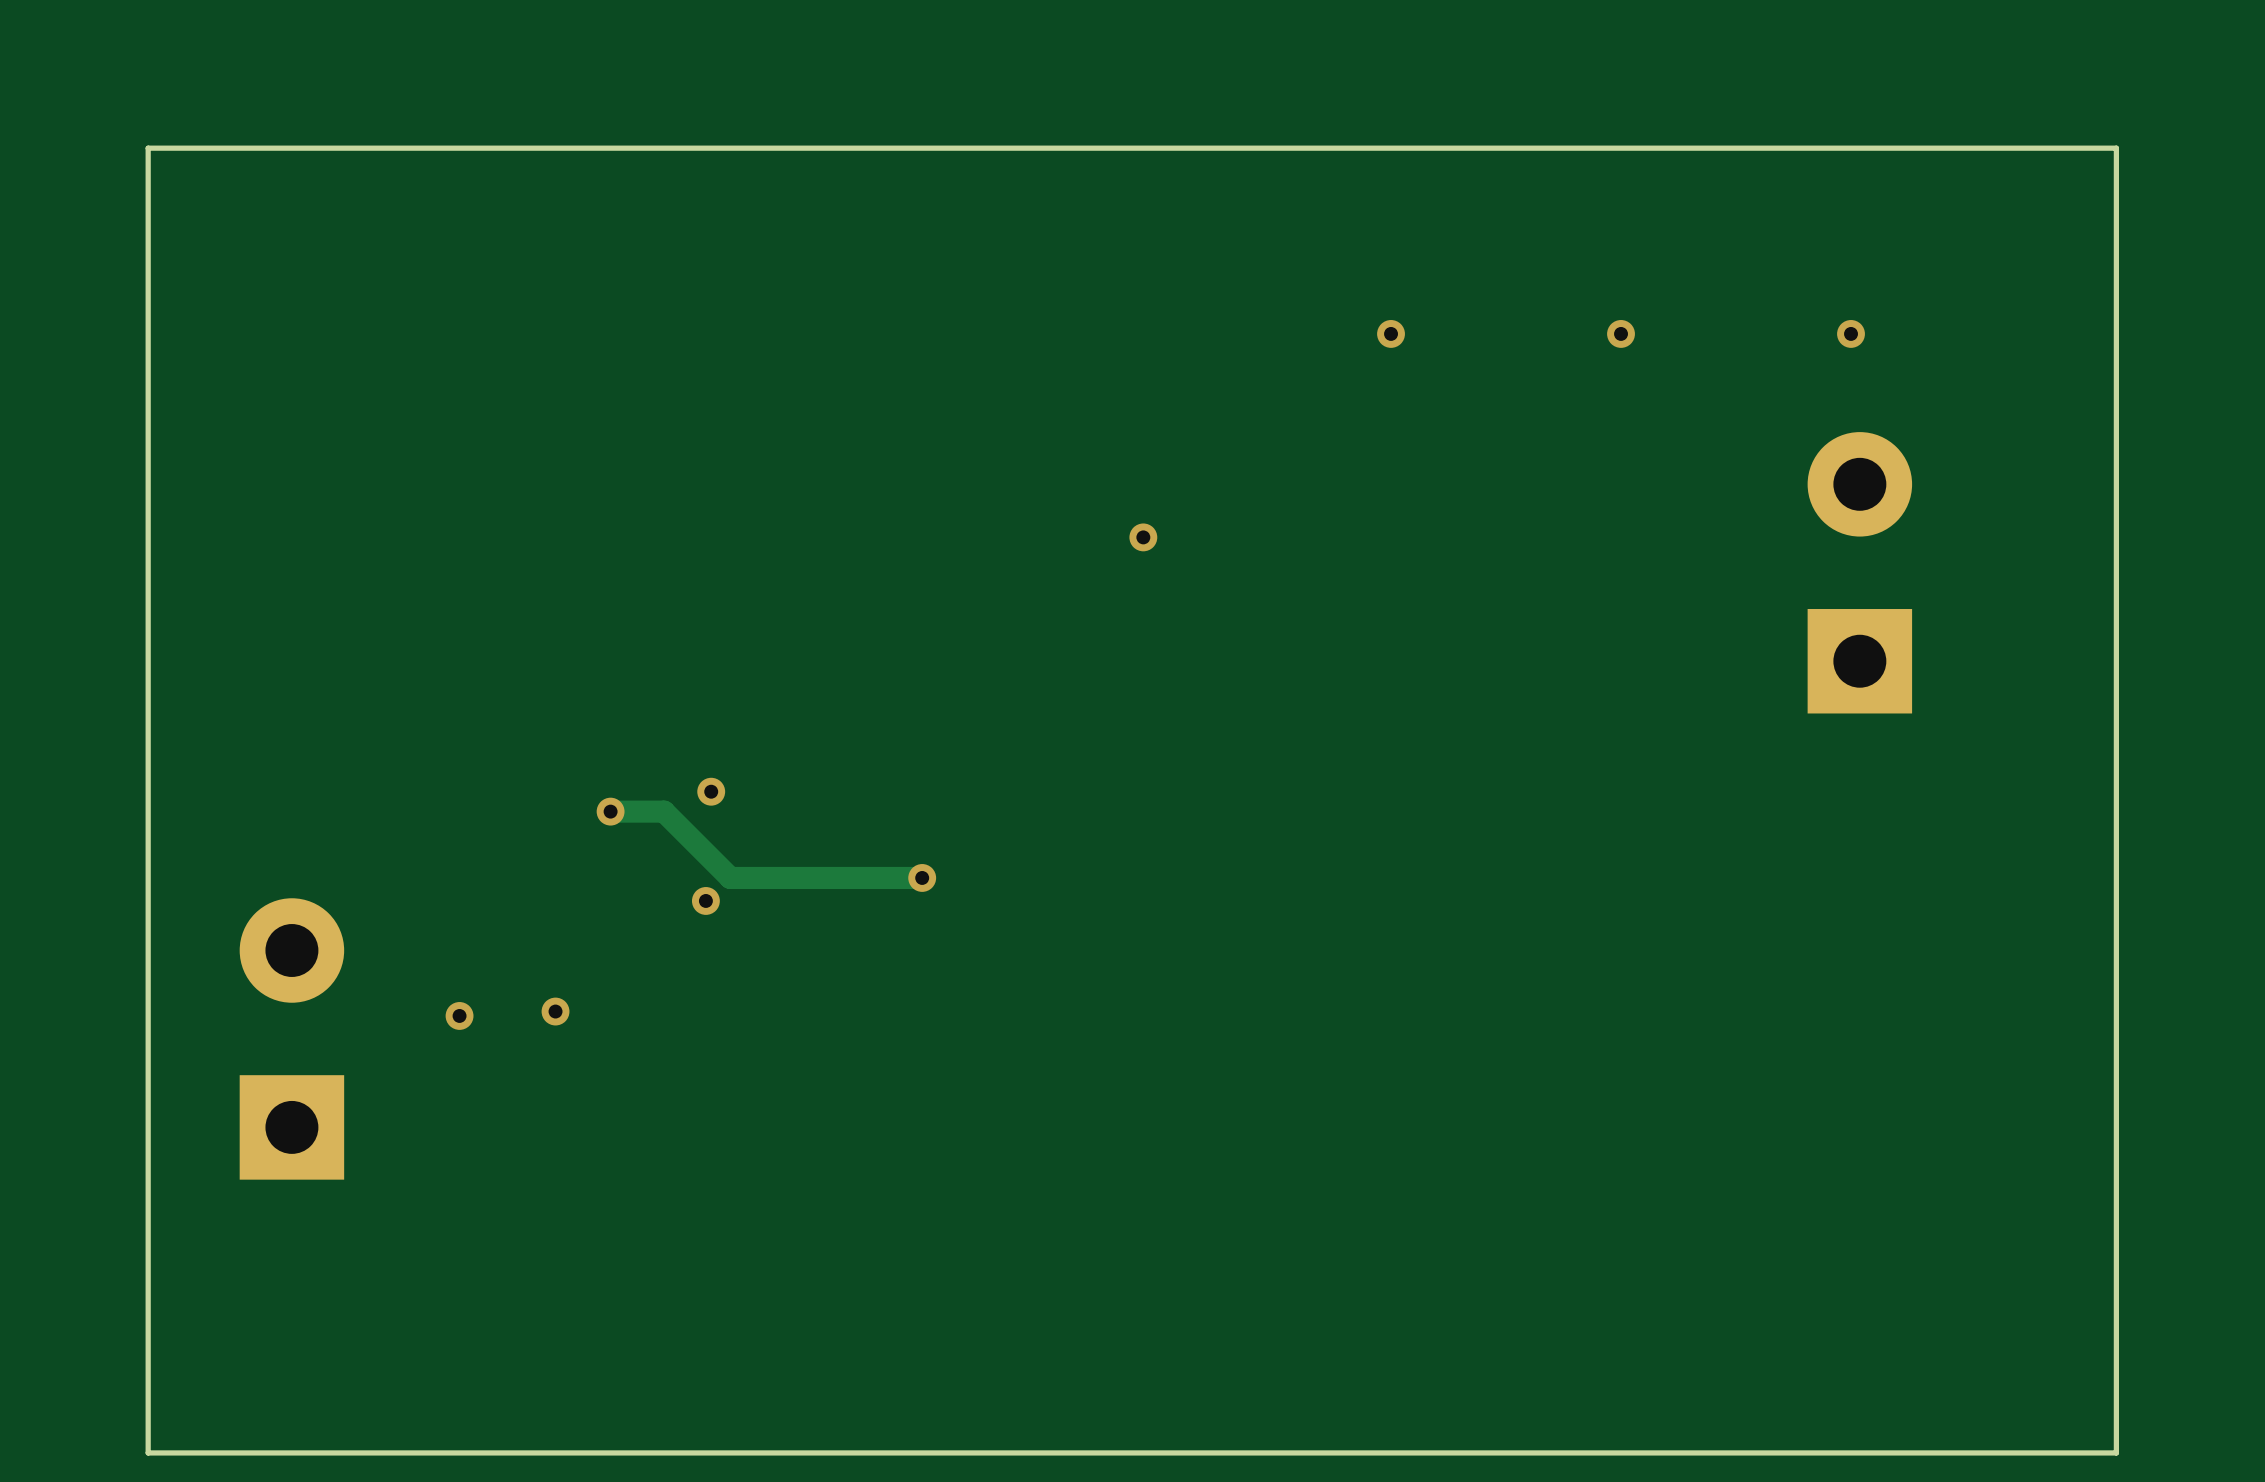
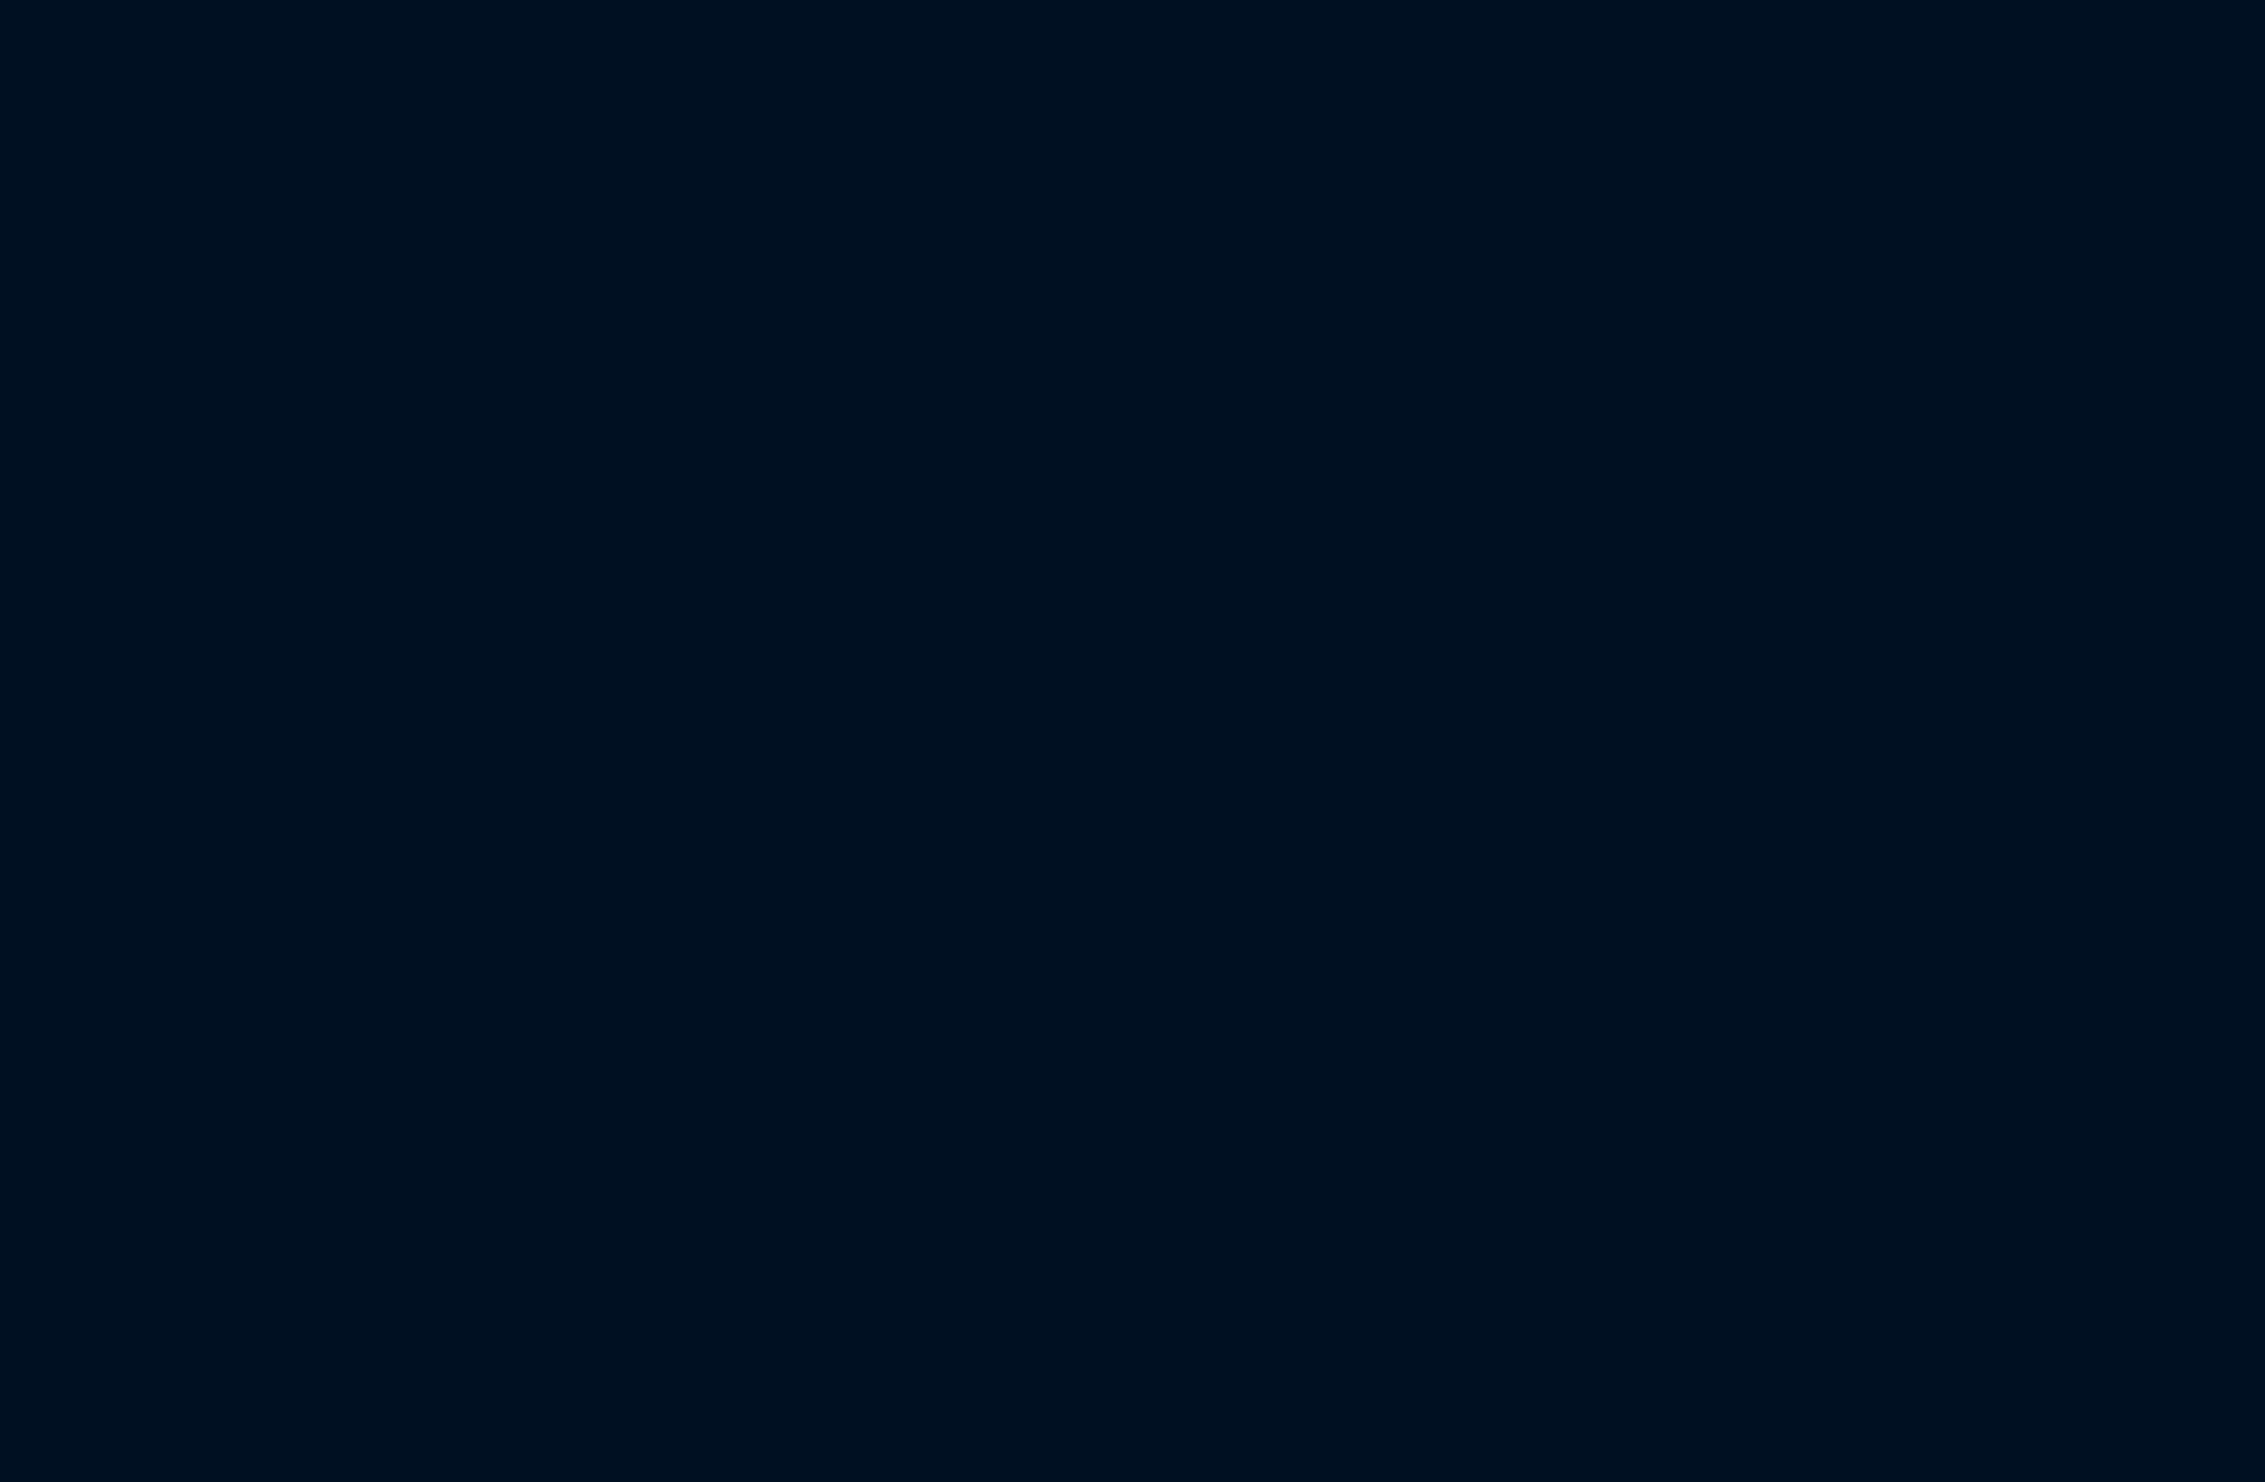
board edge: (2116, 148) (2116, 1452) (148, 1452) (148, 148) (2116, 148) -> none
via: (1391, 333) -> none
via: (1621, 333) -> none
via: (1851, 333) -> none
via: (1143, 537) -> none
part: (1859, 572) -> none
via: (711, 791) -> none
track: (610, 811) (664, 811) (730, 877) (922, 877) -> none
via: (610, 811) -> none
via: (922, 877) -> none
via: (705, 900) -> none
via: (555, 1011) -> none
via: (459, 1015) -> none
part: (291, 1038) -> none

